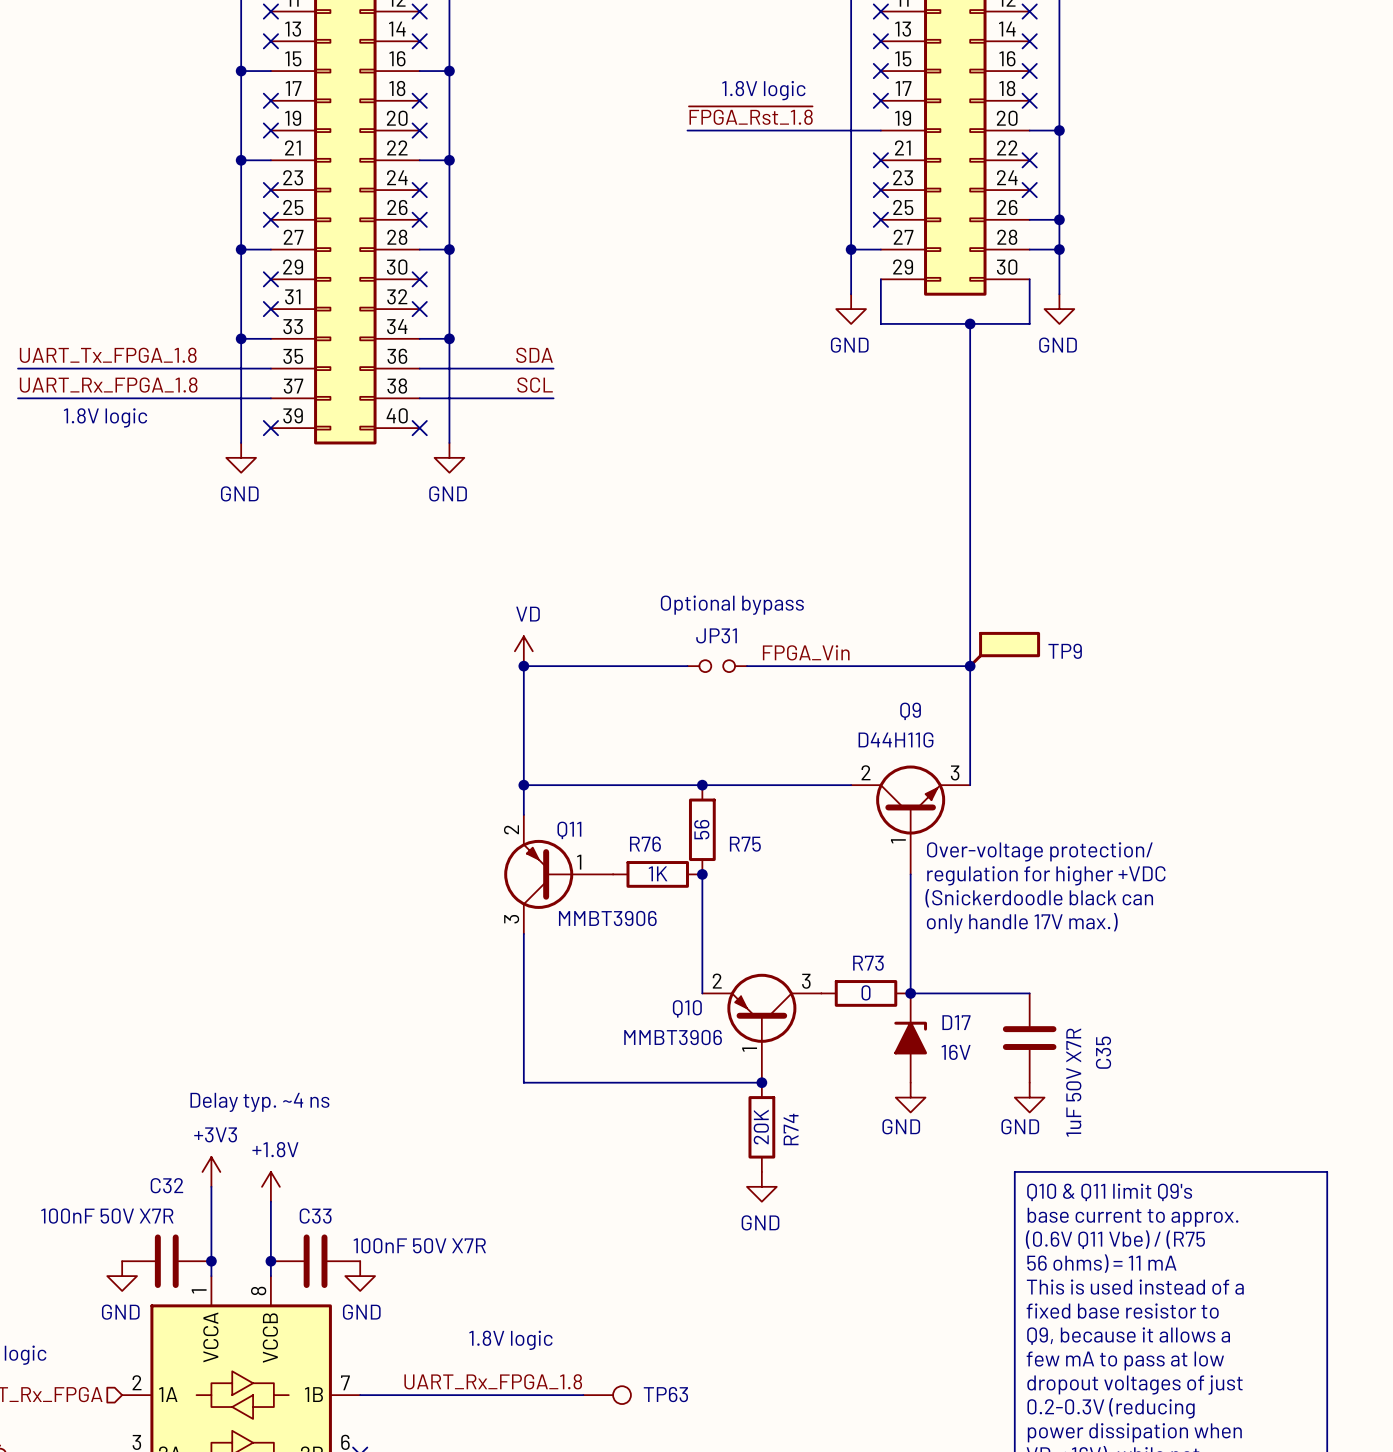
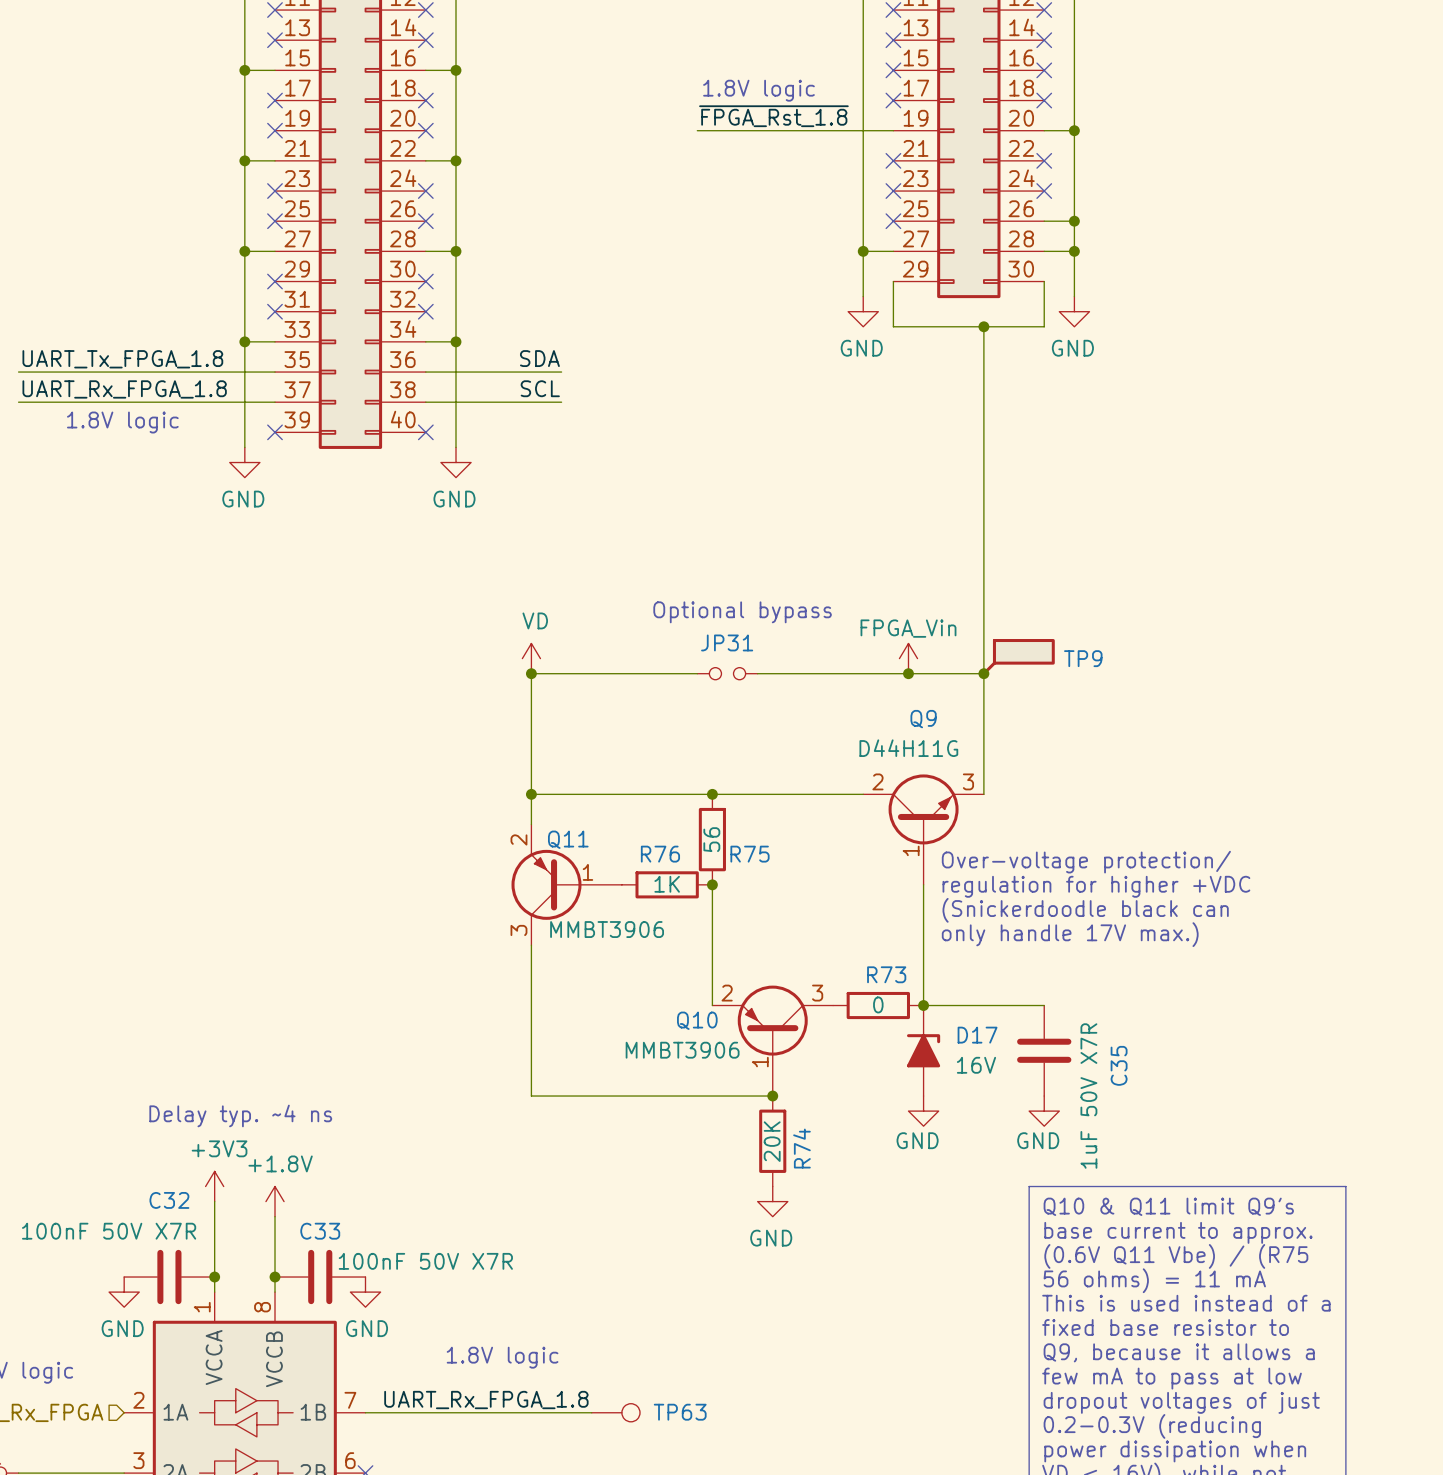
power symbol: none -> FPGA_Vin (908, 658)
label: FPGA_Vin (806, 652) -> none
junction: none -> (908, 673)

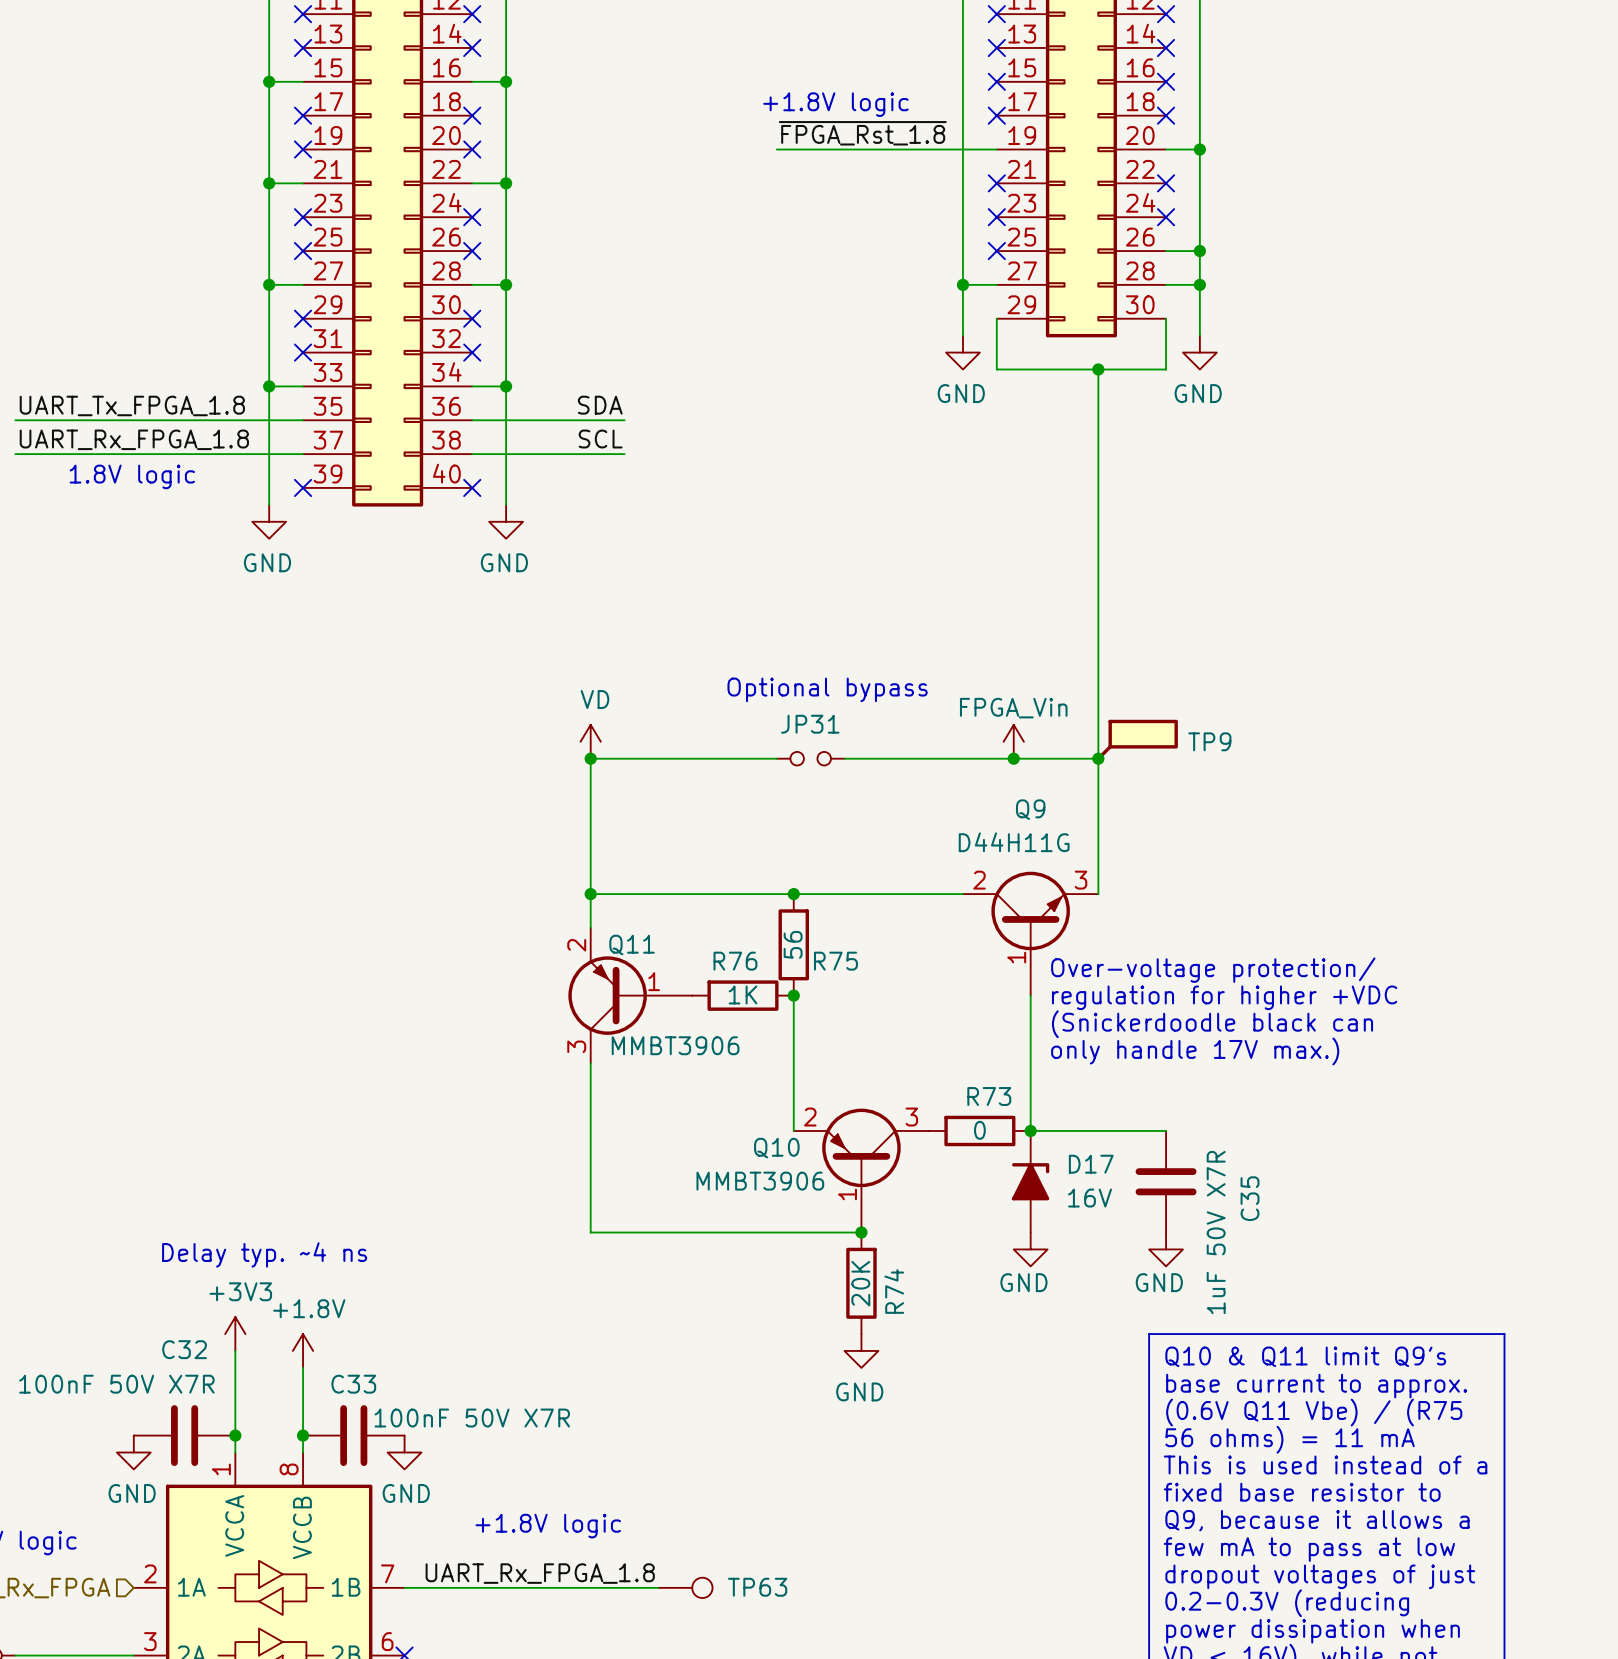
text: 1.8V logic (758, 90) -> +1.8V logic (835, 104)
text: 1.8V logic (502, 1357) -> +1.8V logic (548, 1526)

